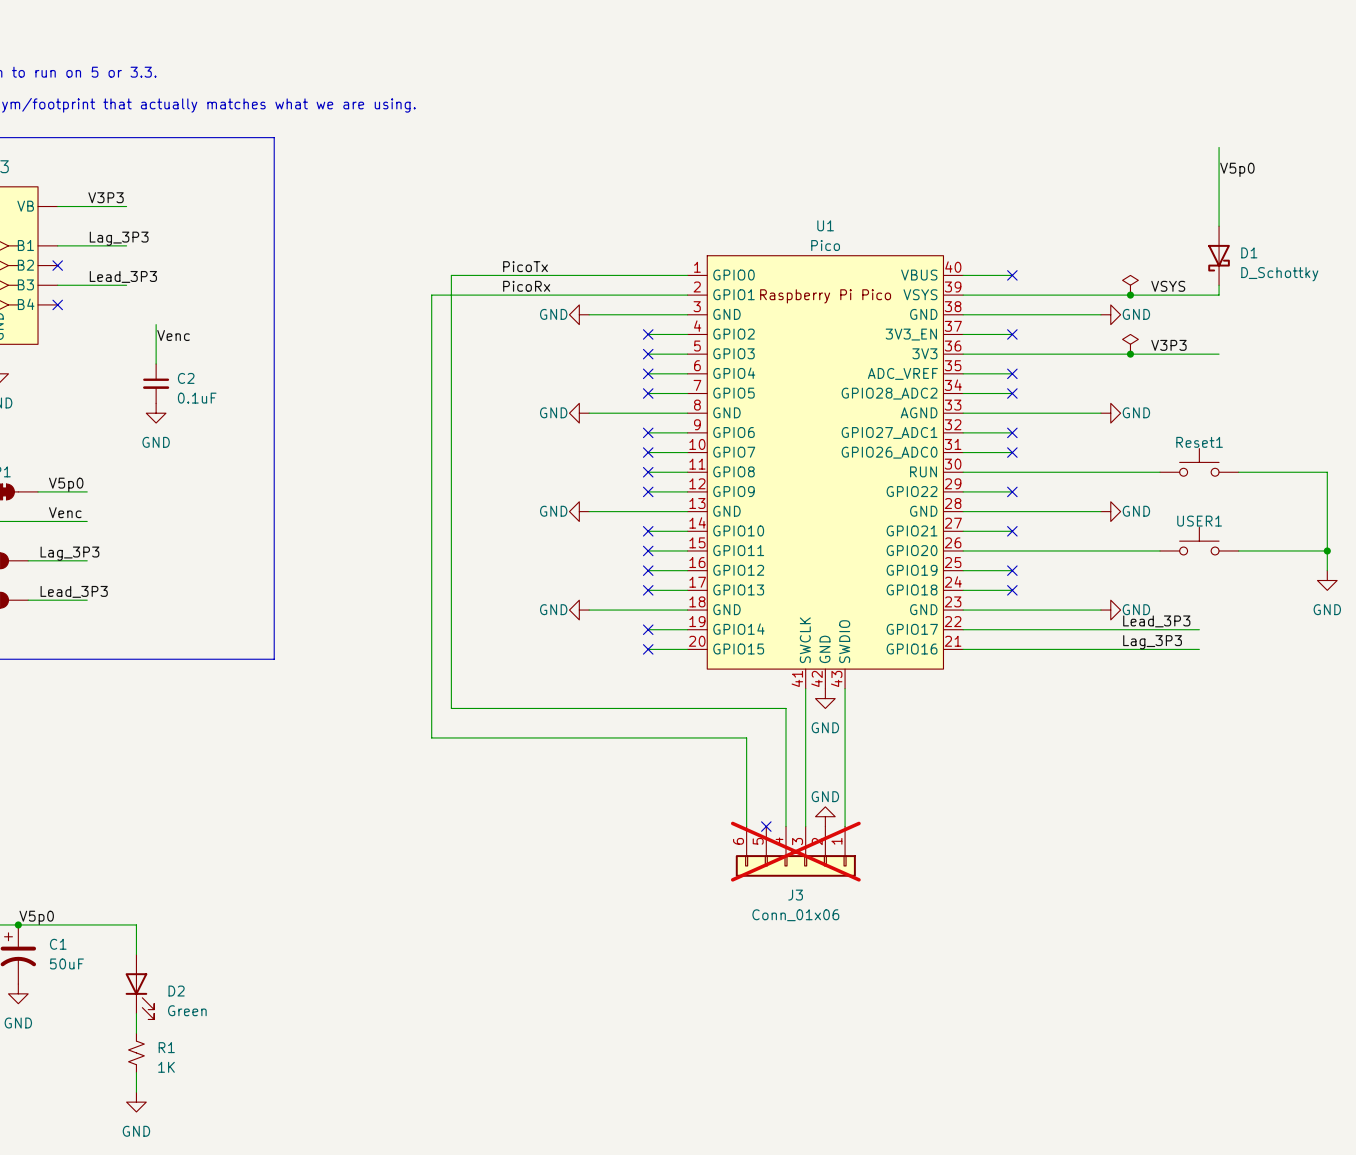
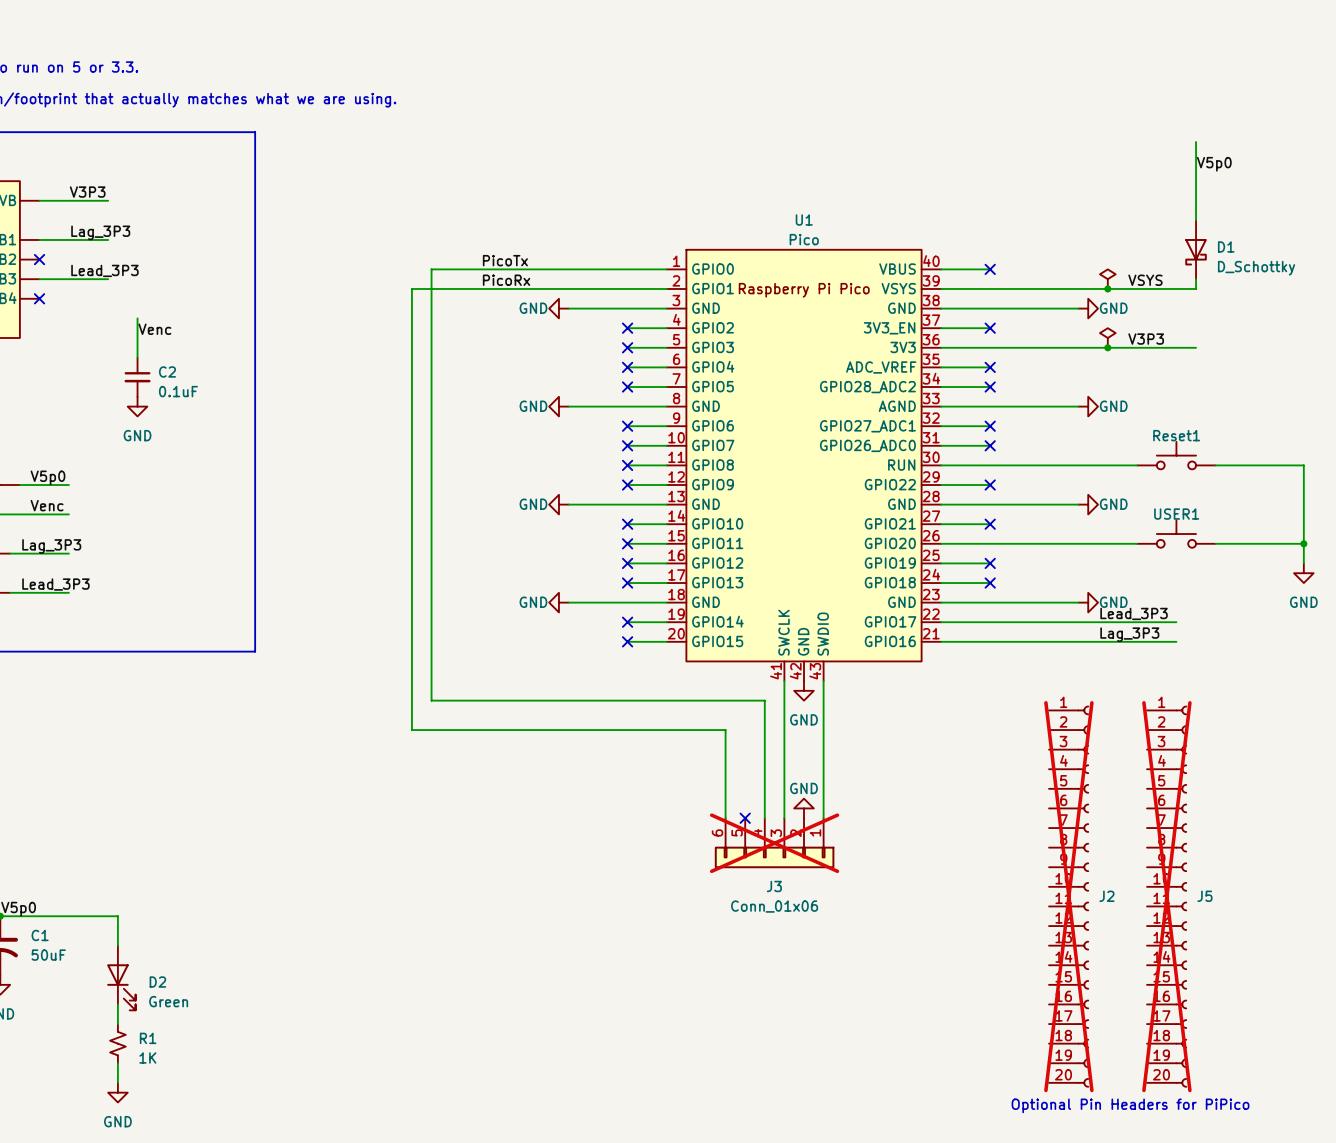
J2: none -> (1068, 896)
J5: none -> (1166, 896)
text: none -> Optional Pin Headers for PiPico (1130, 1105)

